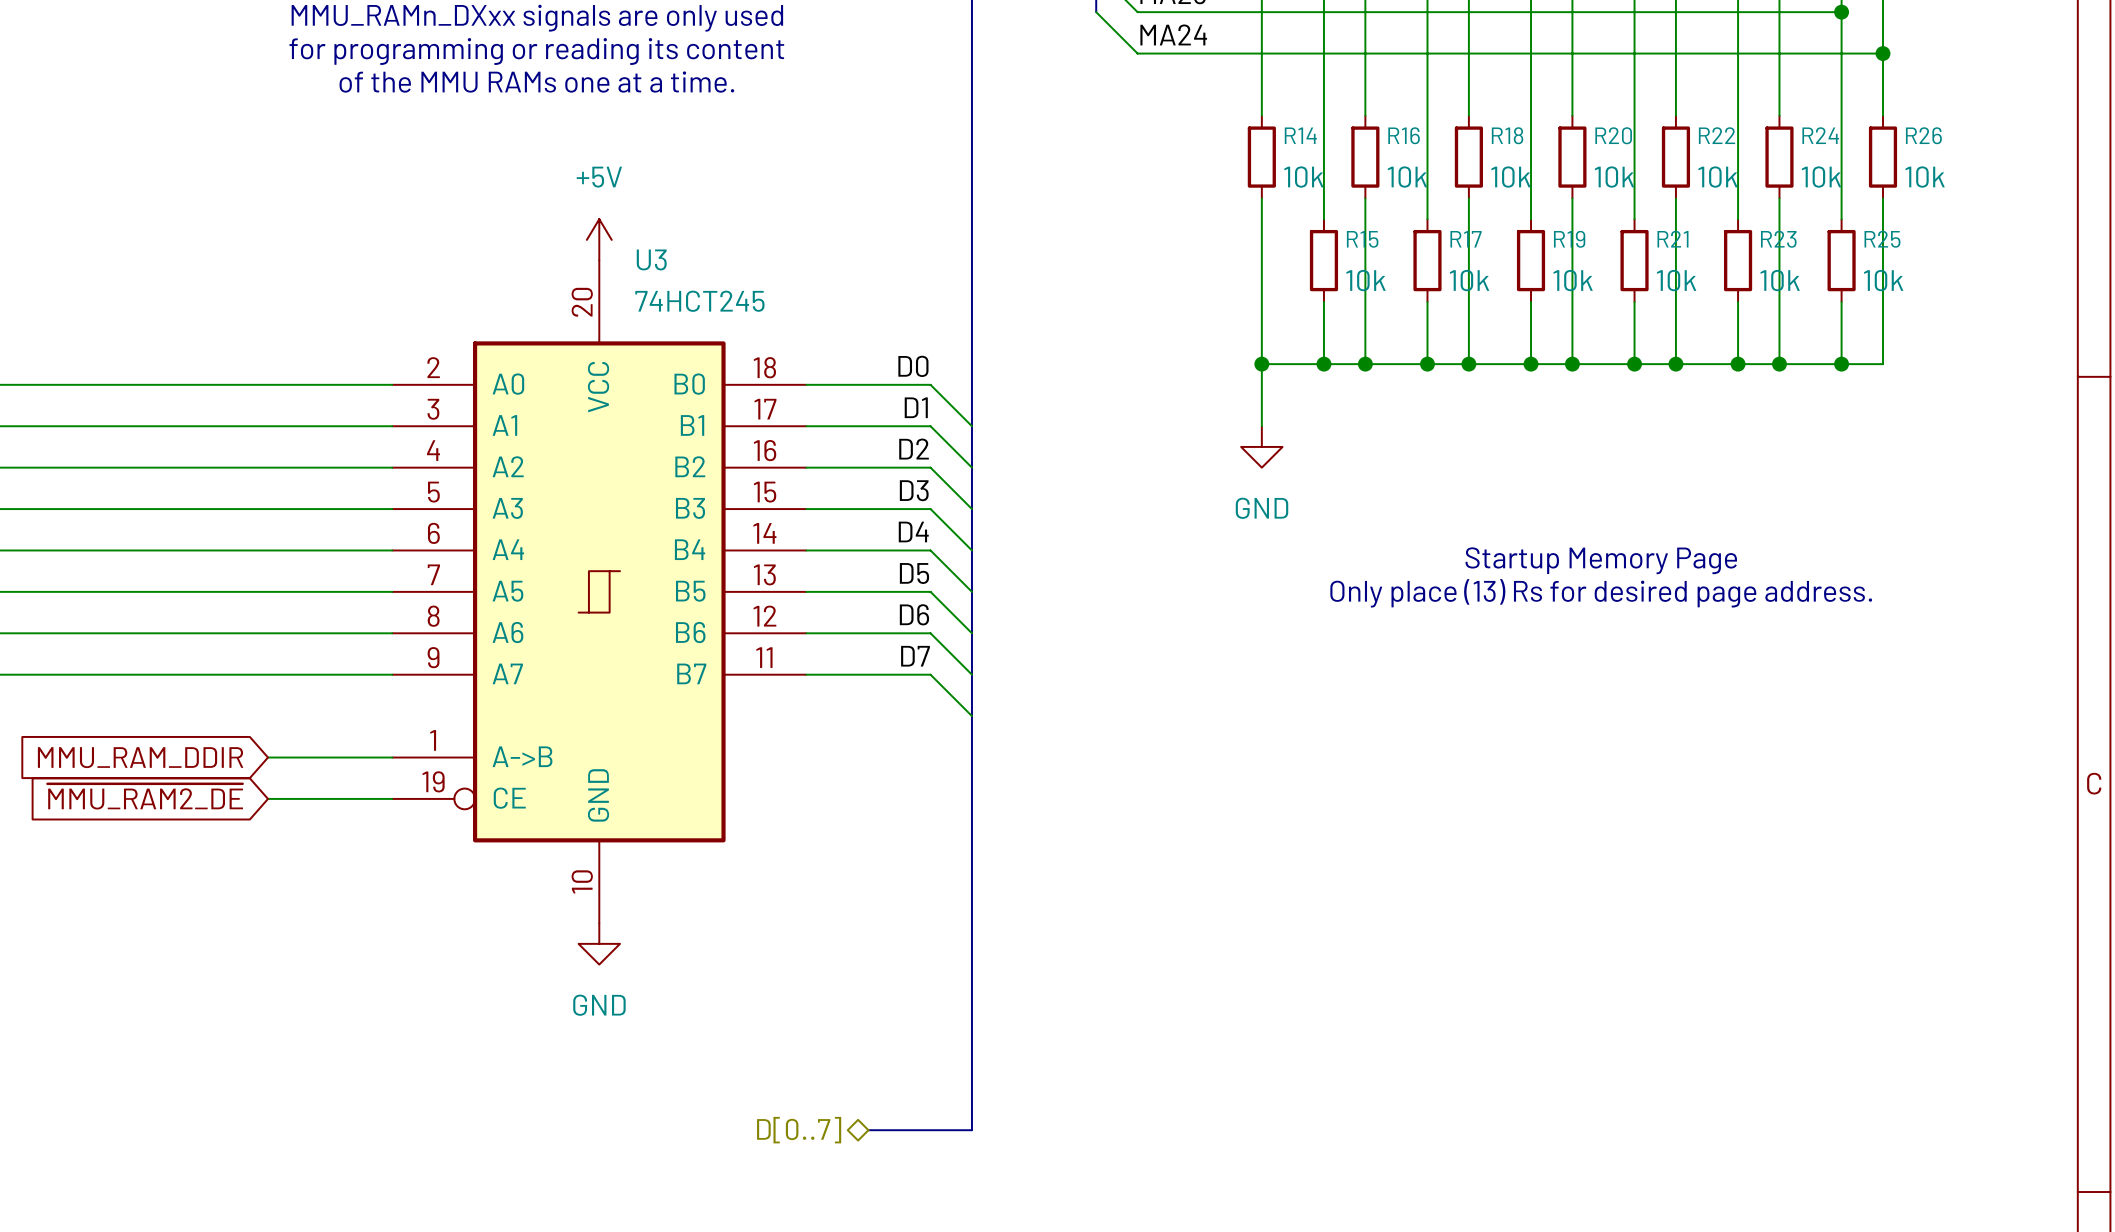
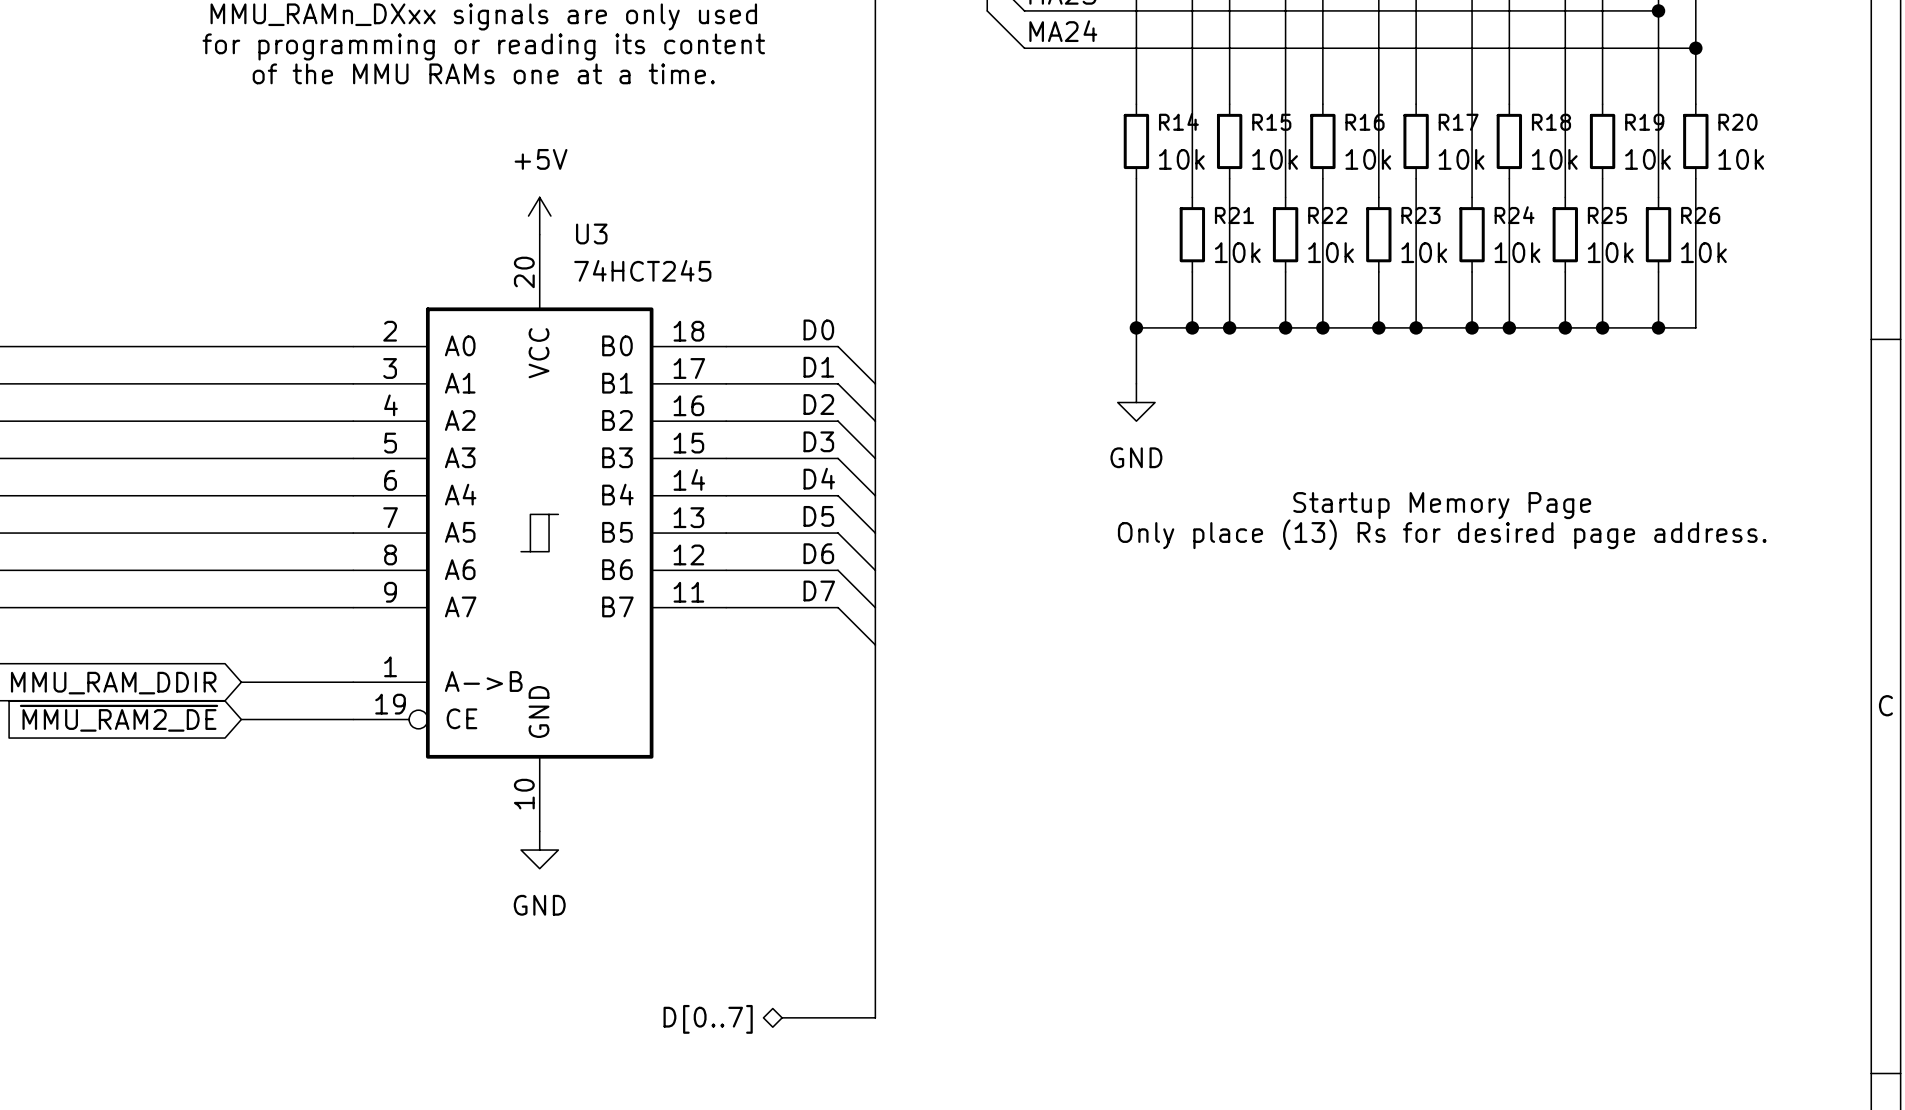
R16 name: R16 (1404, 135) -> R15 (1271, 122)
R18 name: R18 (1507, 135) -> R16 (1365, 122)
R20 name: R20 (1613, 135) -> R17 (1458, 122)
R22 name: R22 (1717, 135) -> R18 (1551, 122)
R24 name: R24 (1820, 135) -> R19 (1644, 122)
R26 name: R26 (1923, 135) -> R20 (1737, 122)
R15 name: R15 (1362, 239) -> R21 (1234, 215)
R17 name: R17 (1466, 239) -> R22 (1327, 215)
R19 name: R19 (1569, 239) -> R23 (1420, 215)
R21 name: R21 (1672, 239) -> R24 (1514, 215)
R23 name: R23 (1778, 239) -> R25 (1607, 215)
R25 name: R25 (1882, 239) -> R26 (1700, 215)

